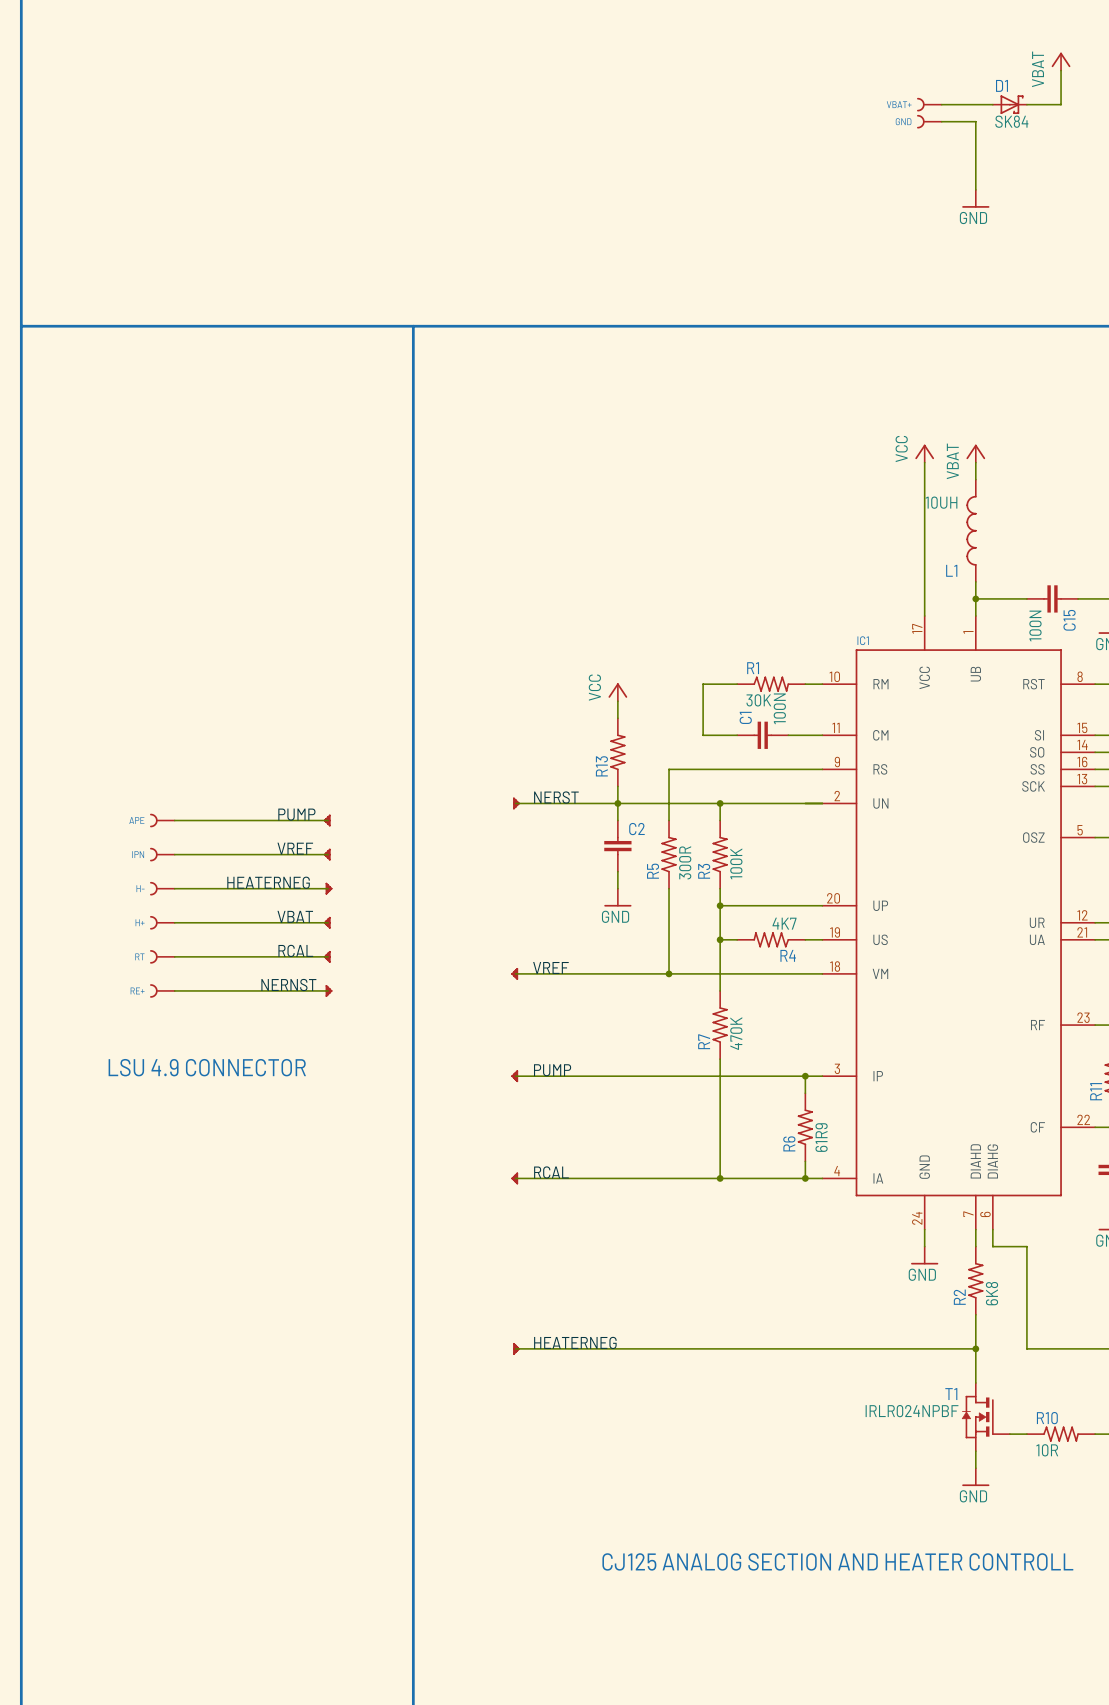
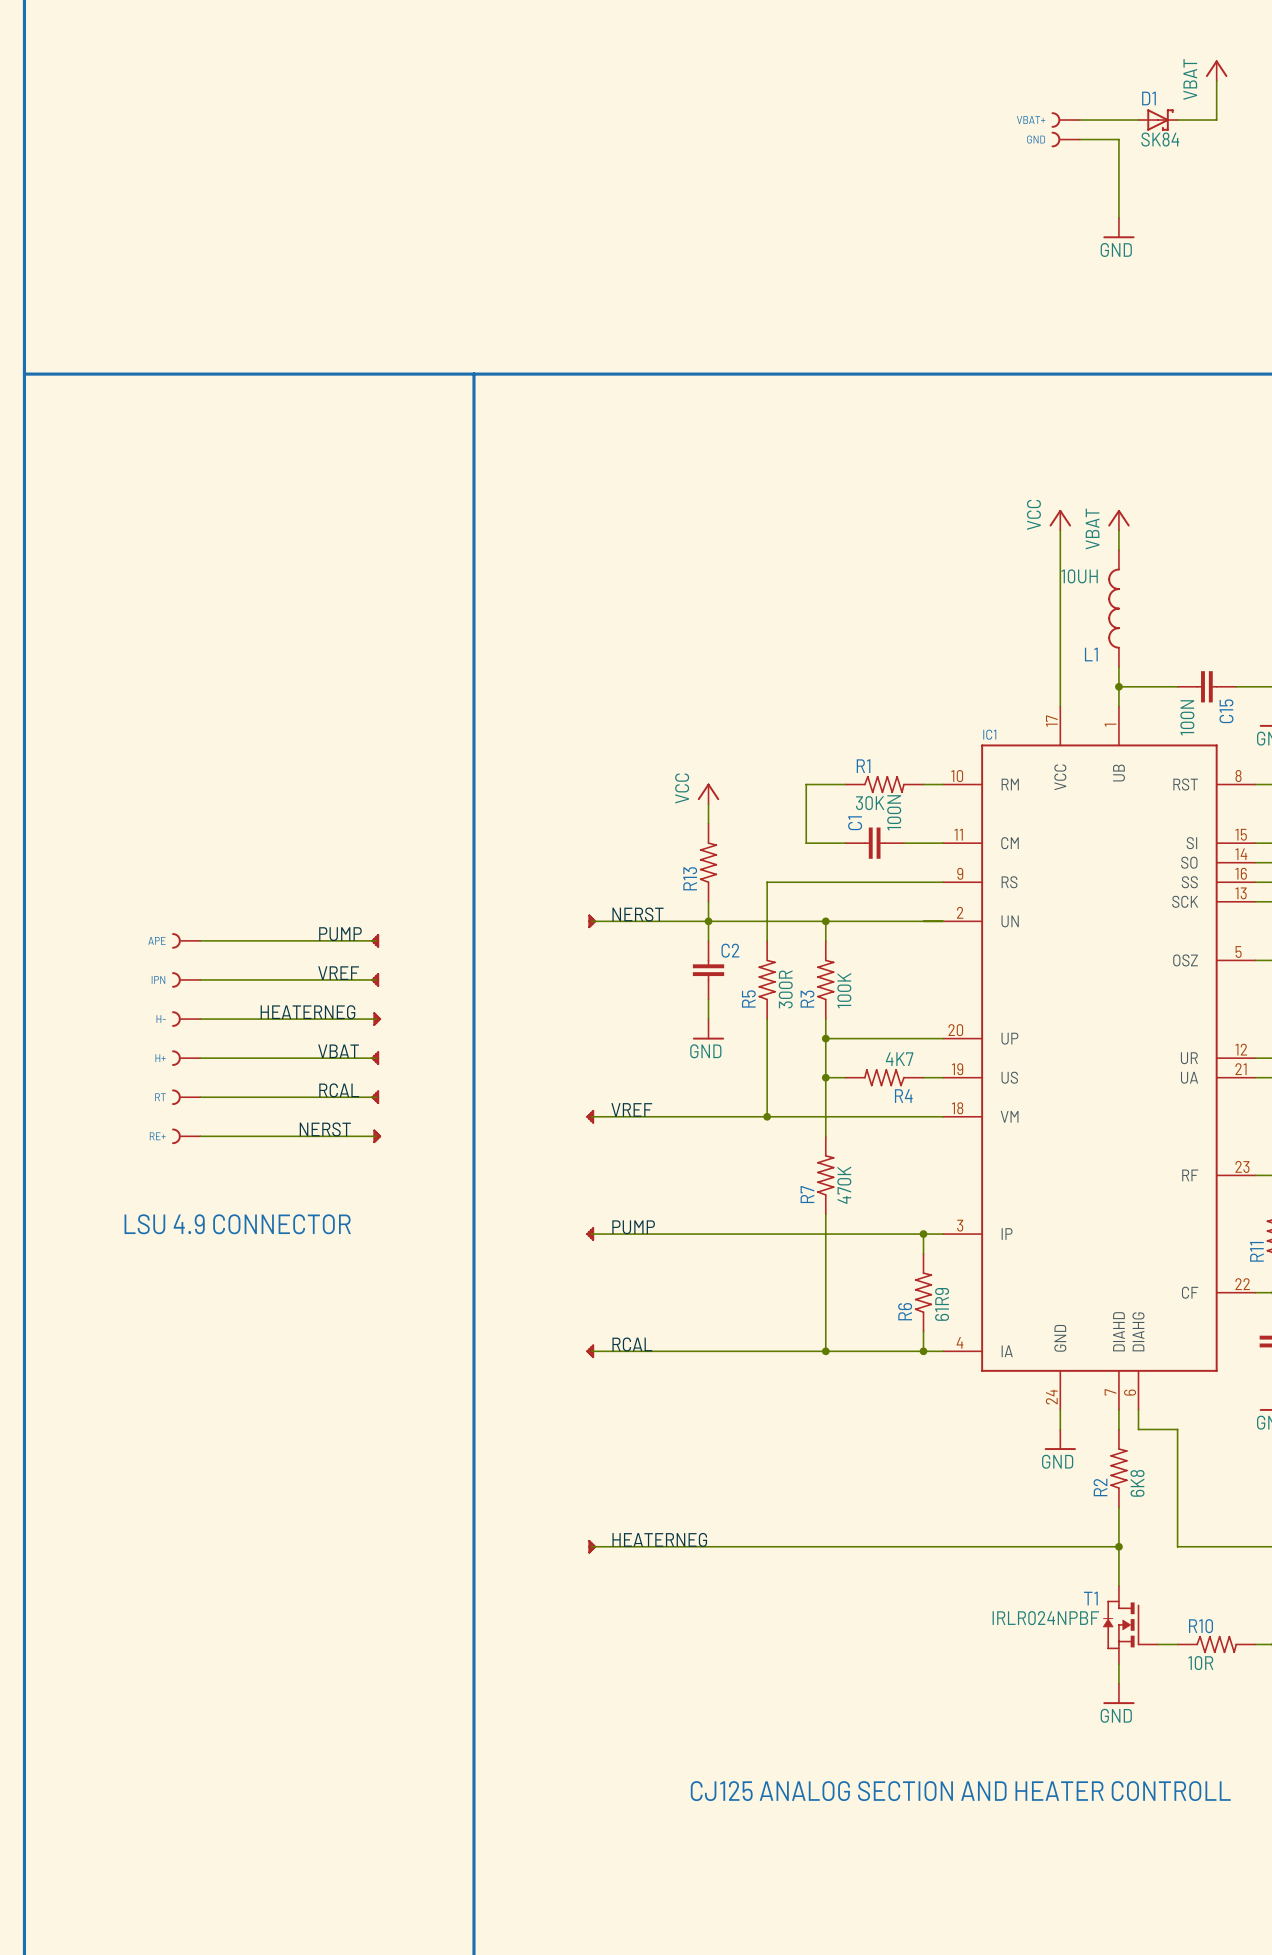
label: NERNST (288, 984) -> NERST (325, 1129)

